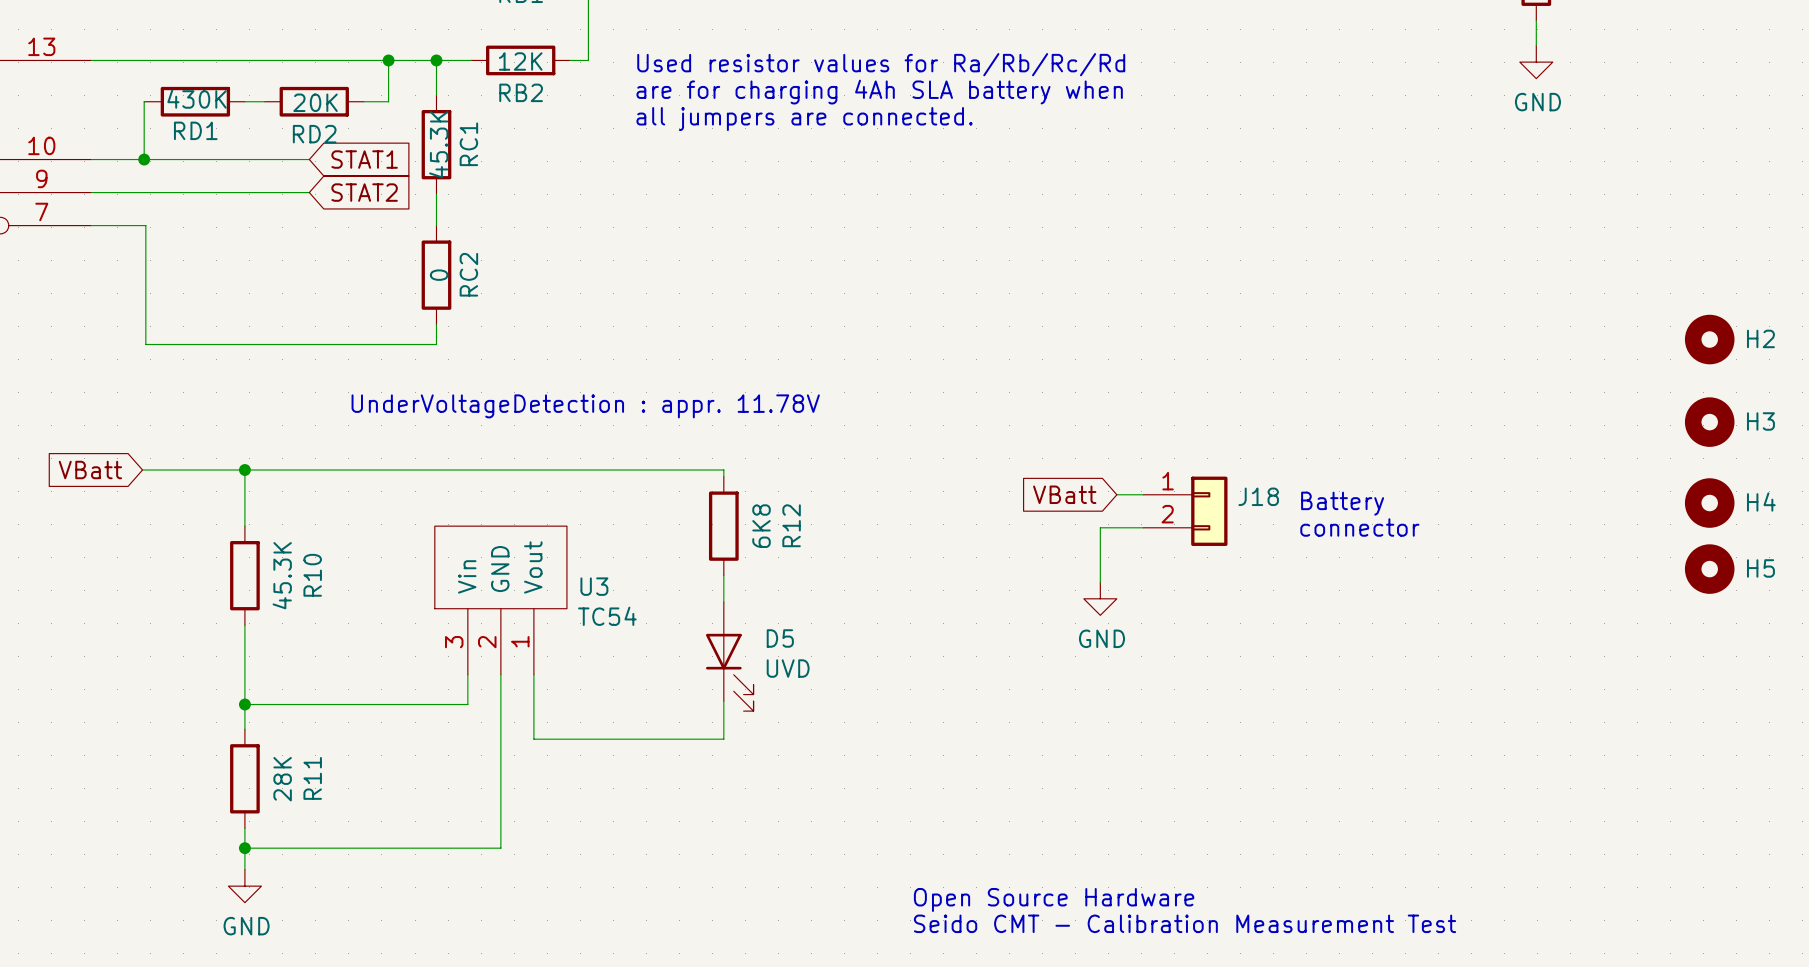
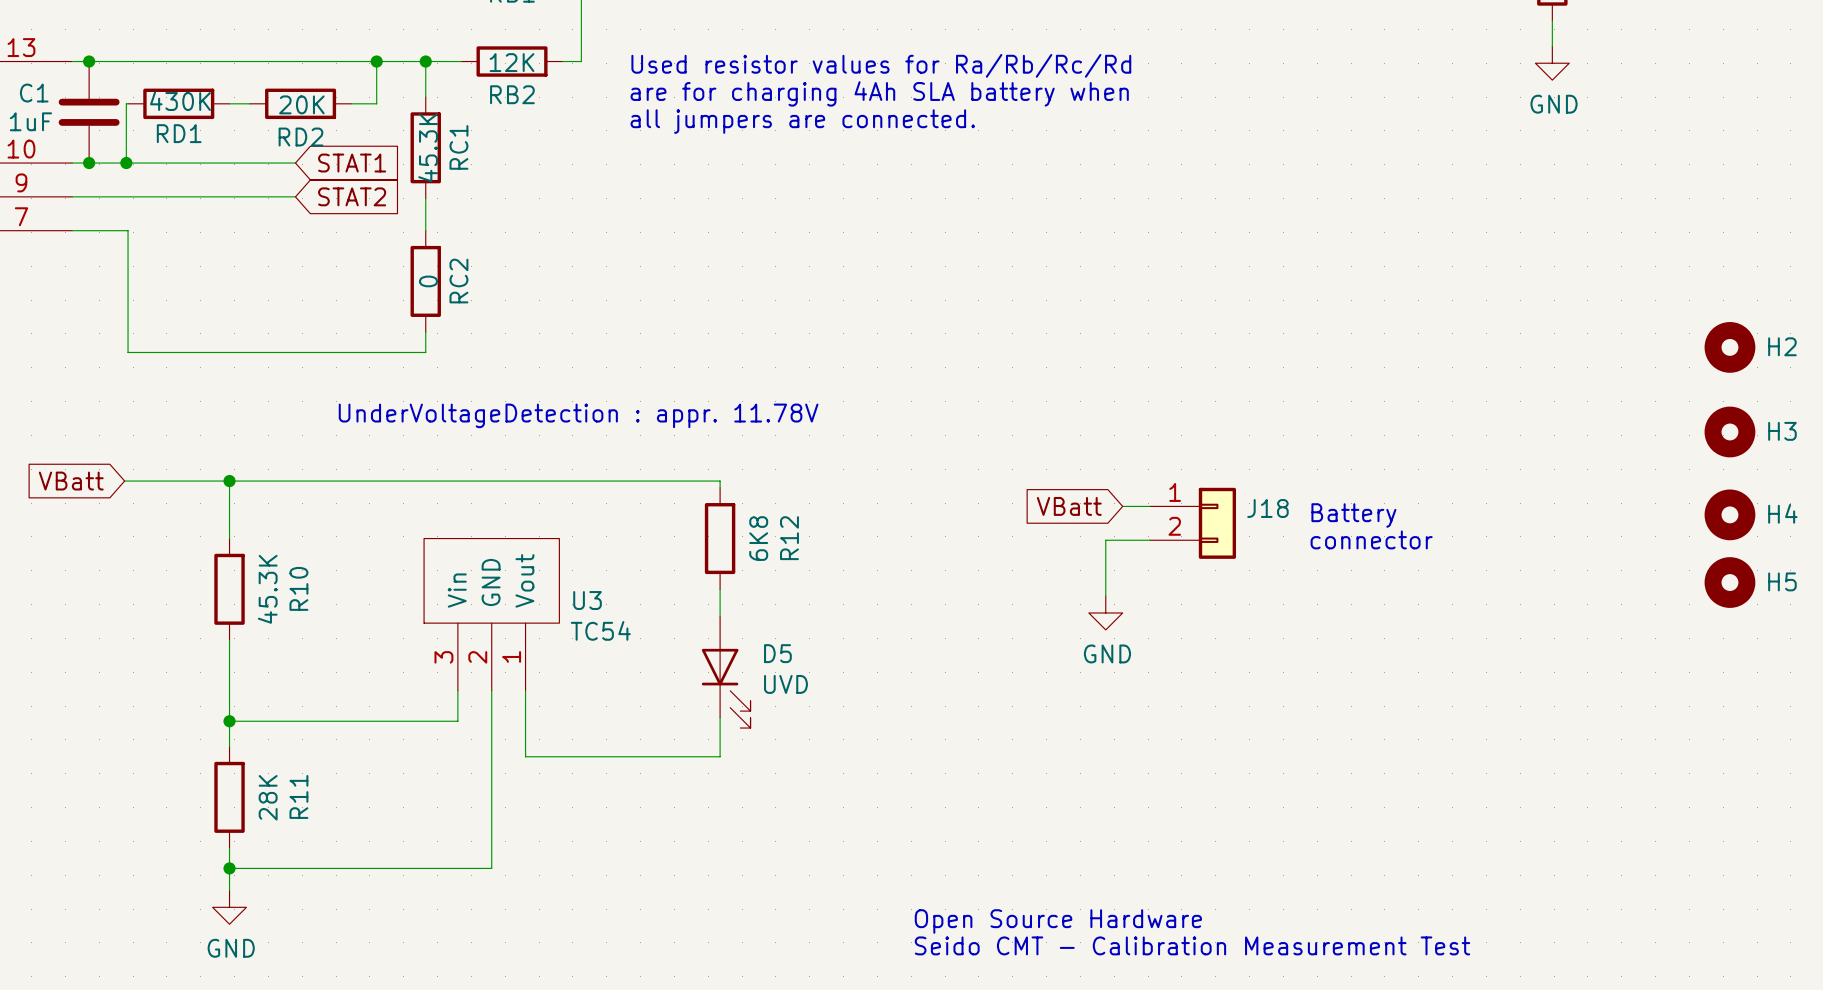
junction: none -> (89, 61)
C1: none -> 1uF (89, 112)
junction: none -> (89, 163)

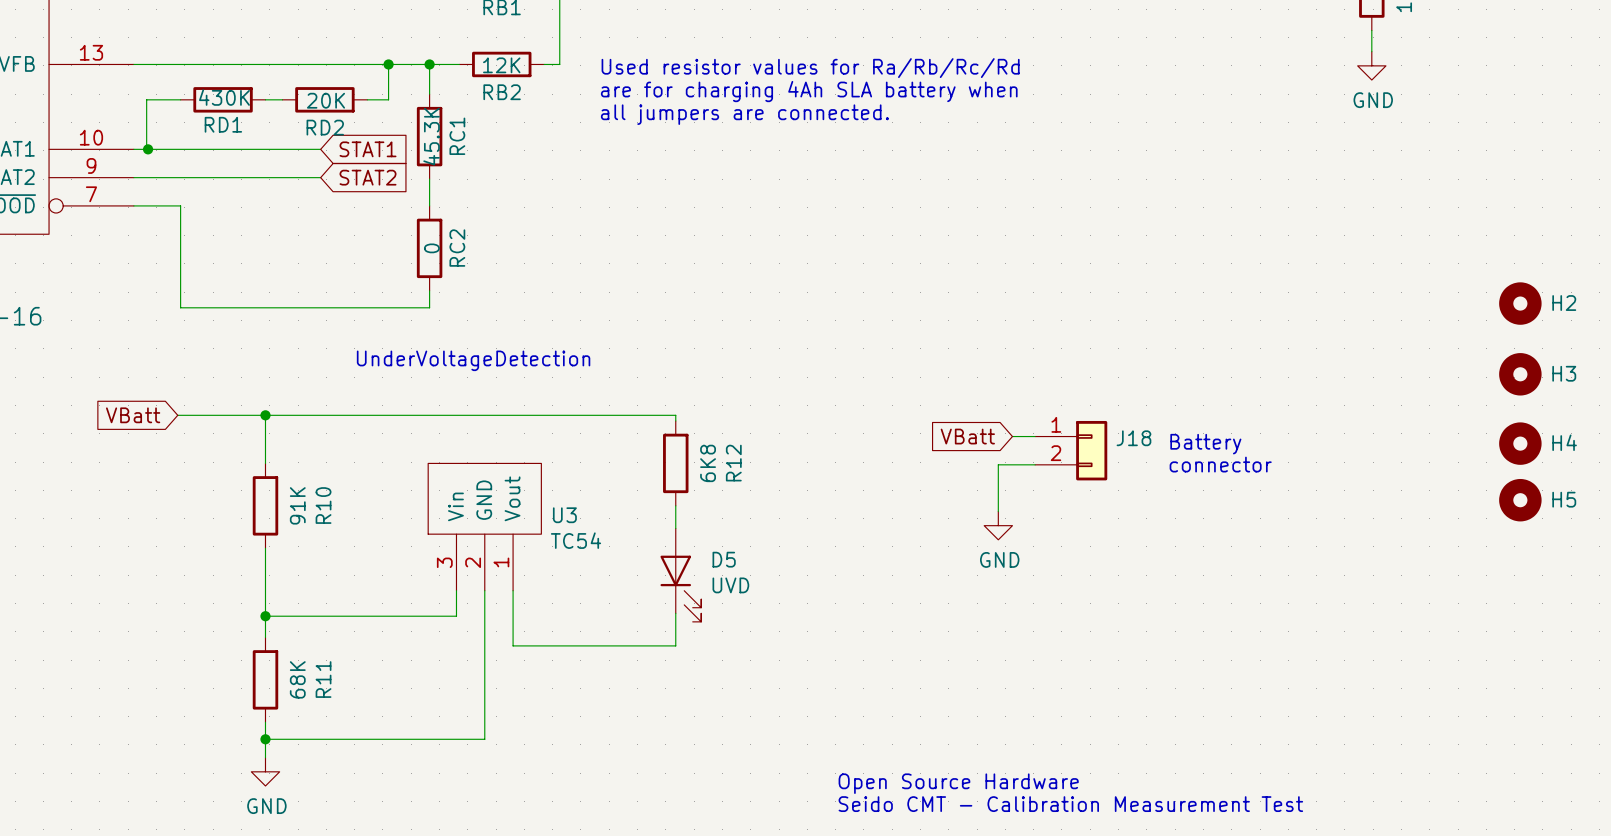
junction: (89, 61) -> none
wire: (126, 103) (126, 163) -> (179, 99) (146, 99) (146, 149)
C1: 1uF (89, 112) -> none
junction: (126, 163) -> none
text: UnderVoltageDetection : appr. 11.78V (578, 415) -> UnderVoltageDetection (473, 360)
R10 value: 45.3K (267, 589) -> 91K (297, 505)
R11 value: 28K (268, 797) -> 68K (297, 679)

